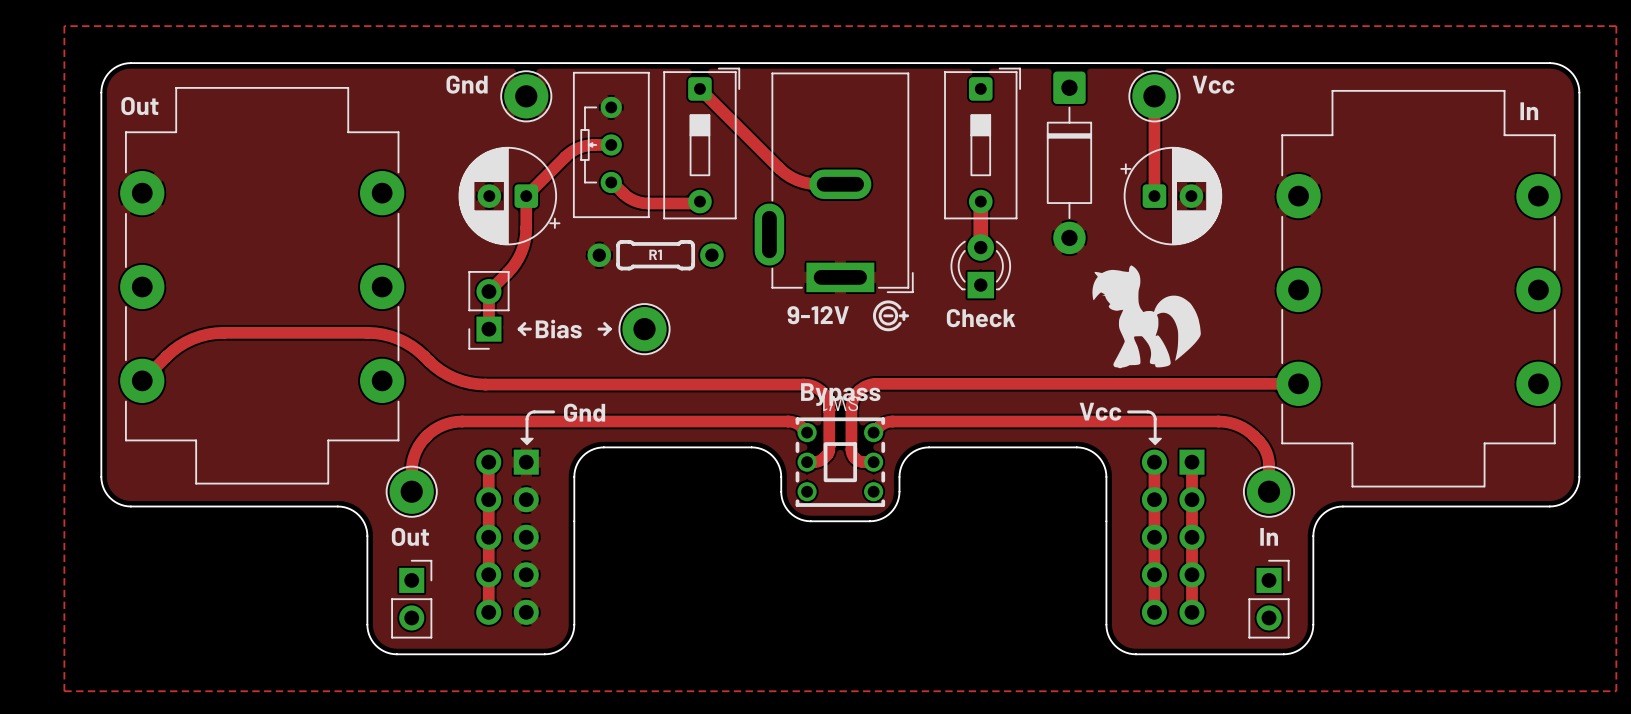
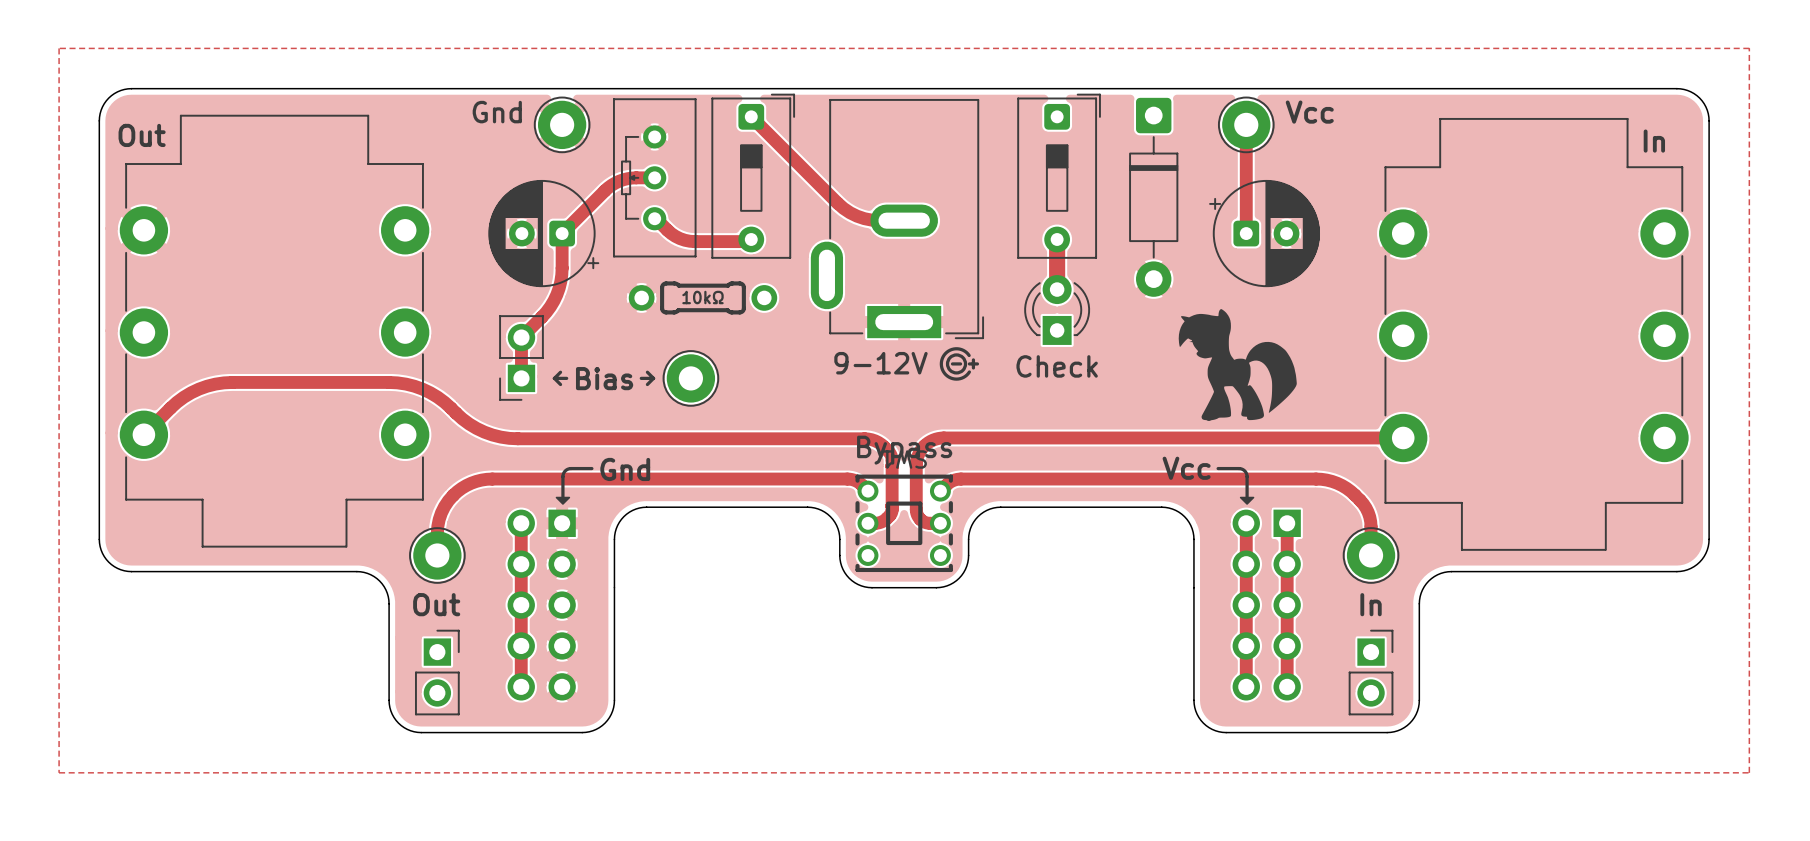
R1 name: R1 (655, 254) -> 10kΩ (702, 297)

